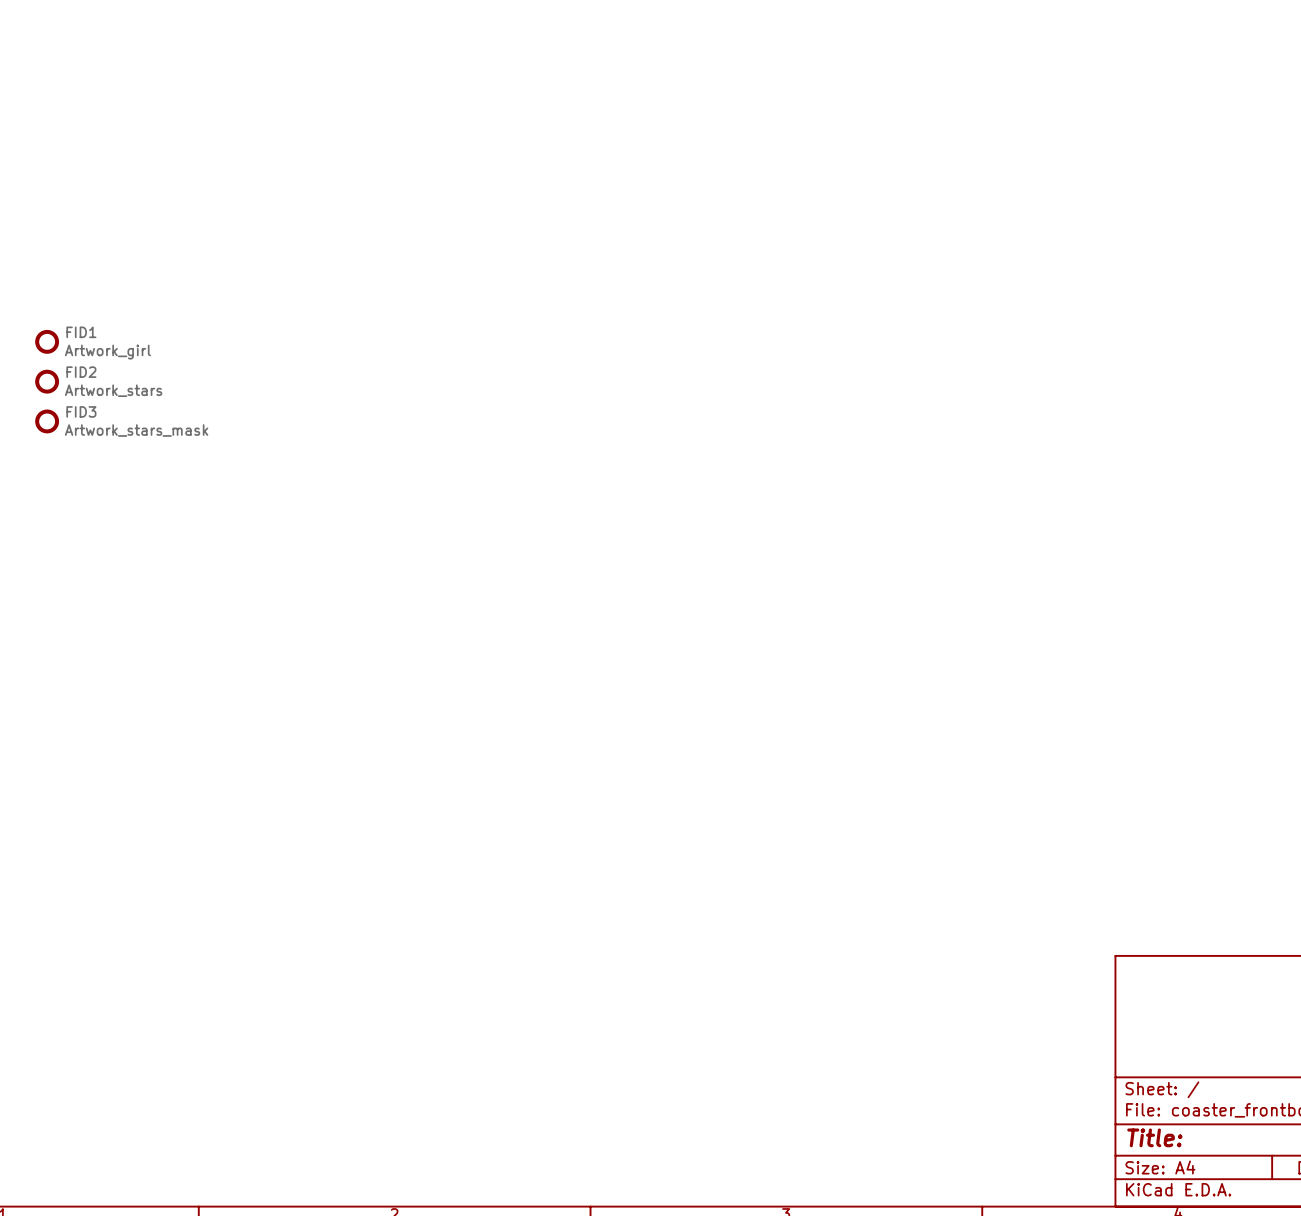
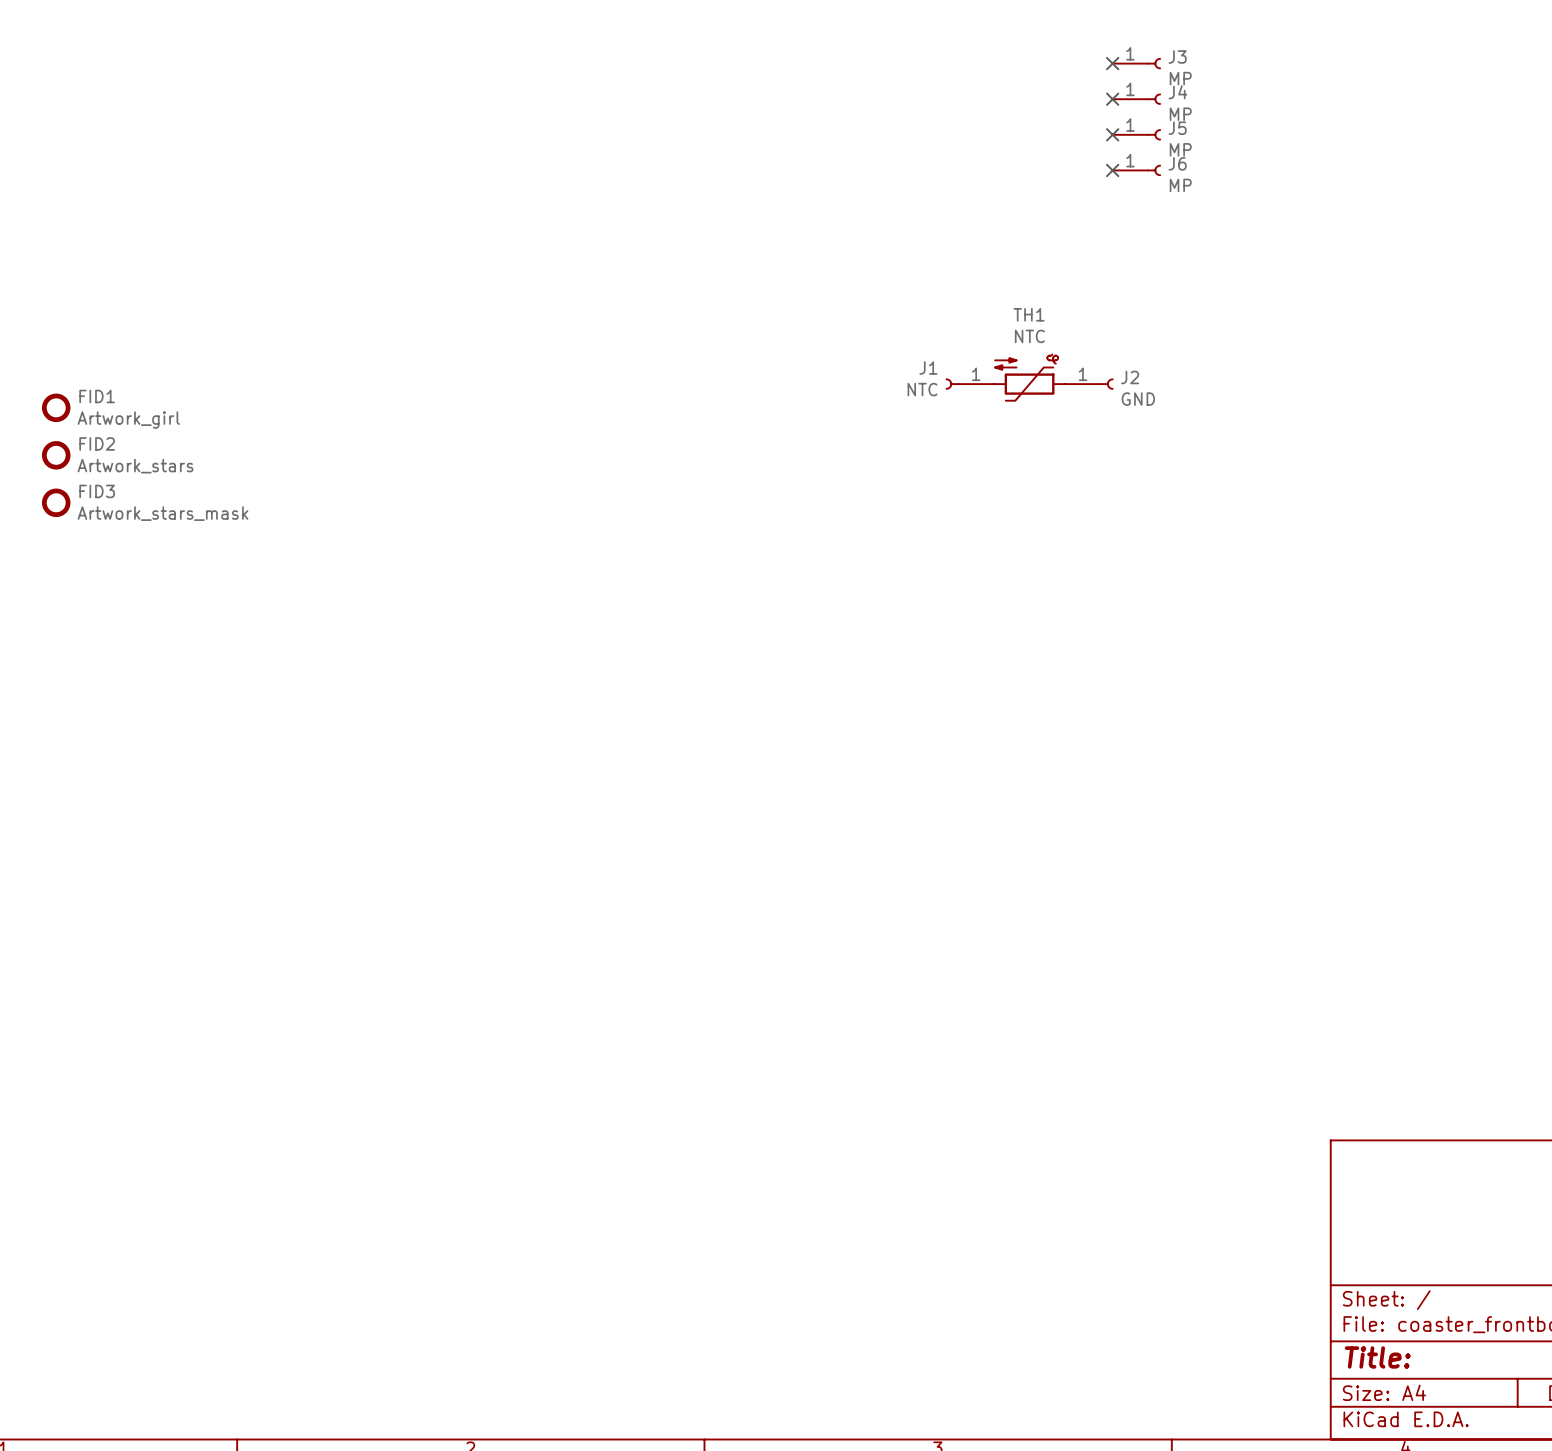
no-connect mark: none -> (1112, 63)
J3: none -> MP (1136, 63)
no-connect mark: none -> (1112, 99)
J4: none -> MP (1136, 99)
no-connect mark: none -> (1112, 134)
J5: none -> MP (1136, 134)
no-connect mark: none -> (1112, 170)
J6: none -> MP (1136, 170)
TH1: none -> NTC (1029, 377)
J1: none -> NTC (969, 384)
J2: none -> GND (1089, 384)

